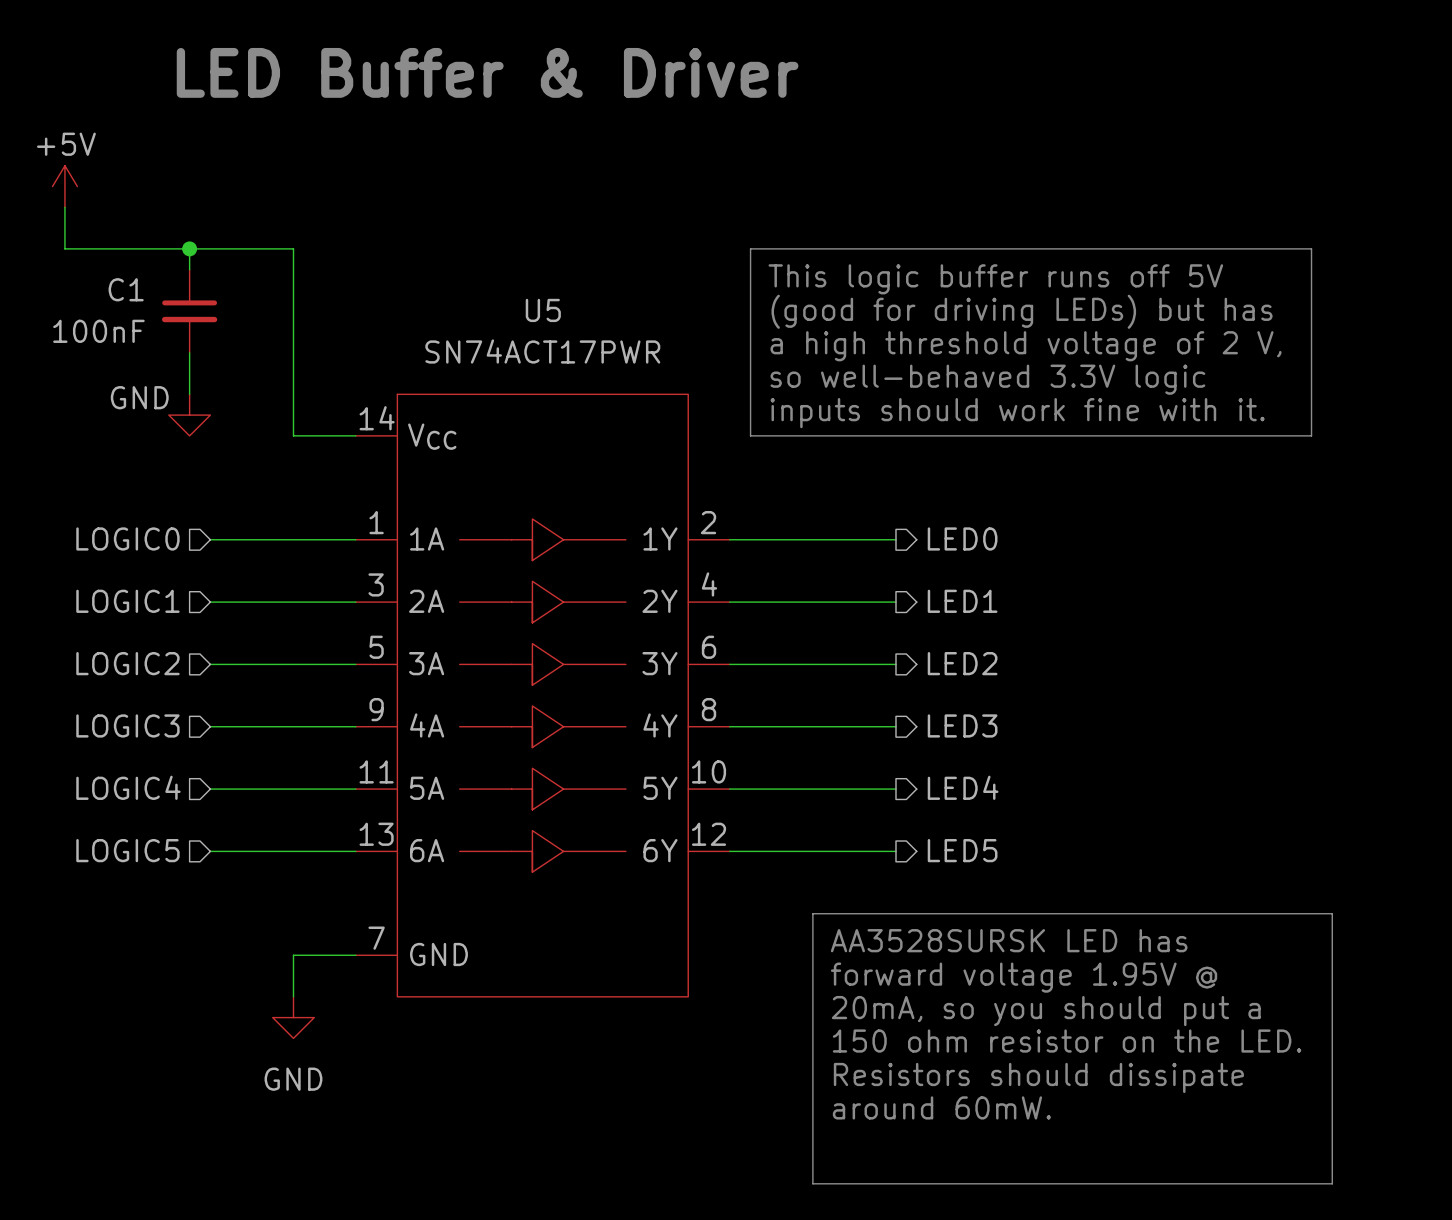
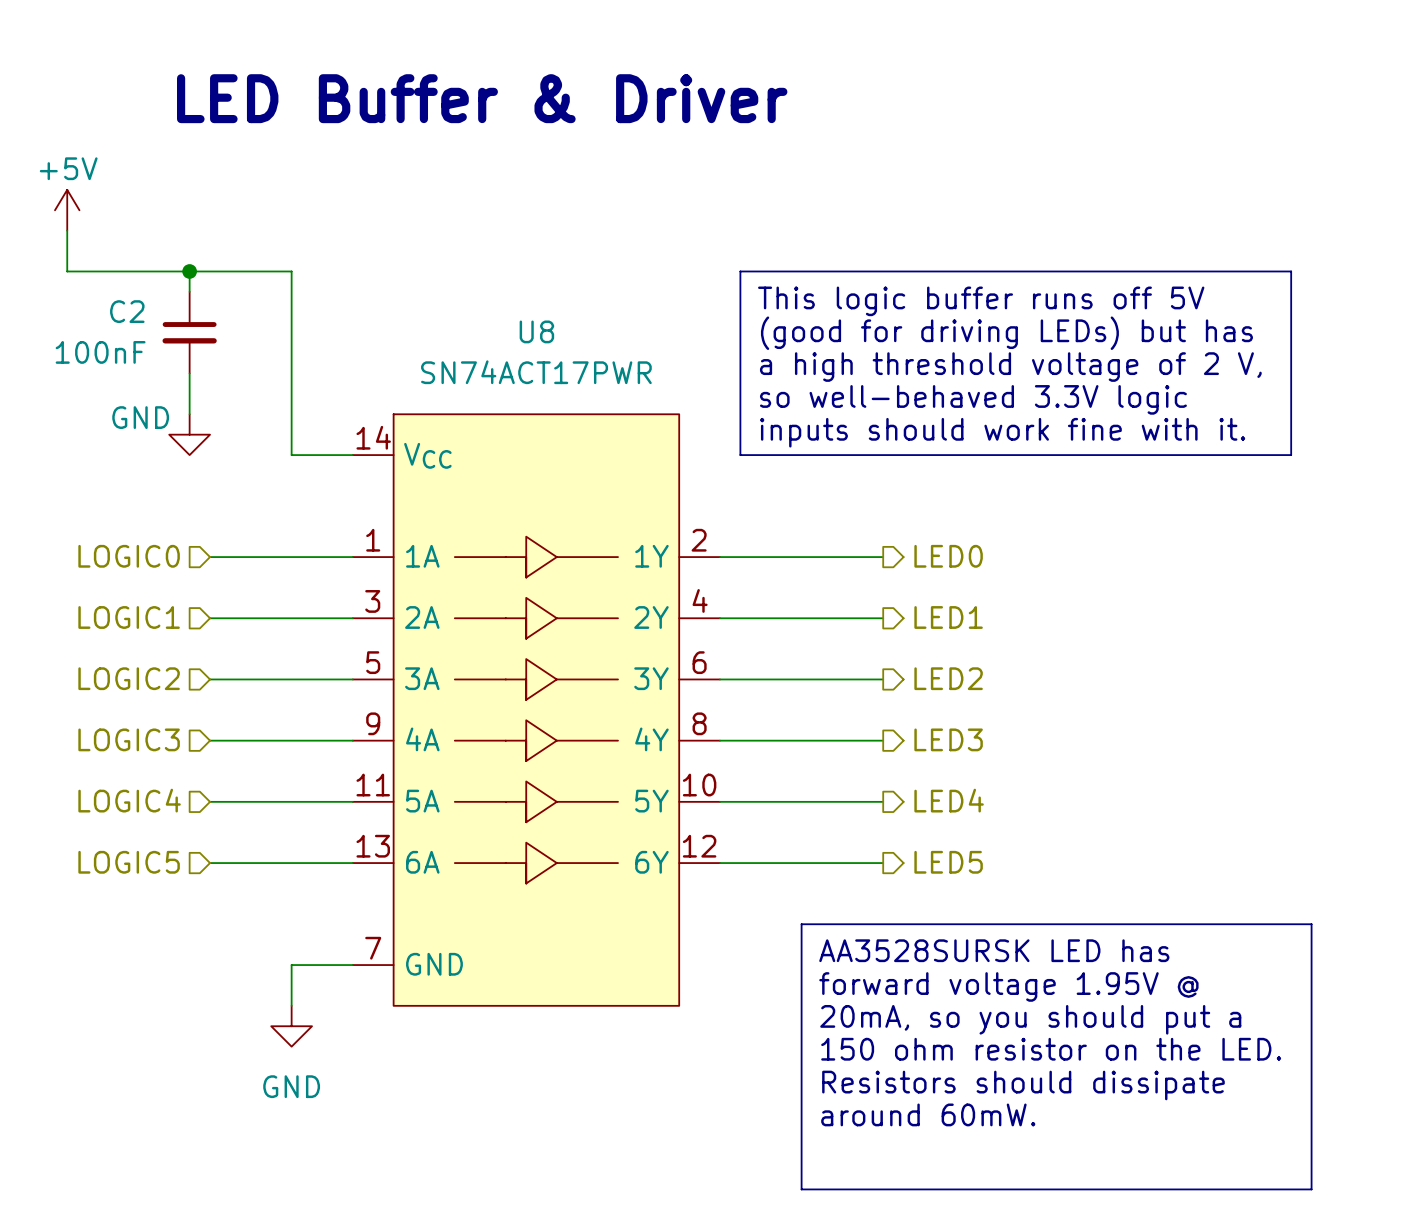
C1 name: C1 (126, 289) -> C2 (127, 311)
U5 name: U5 (543, 310) -> U8 (536, 331)

